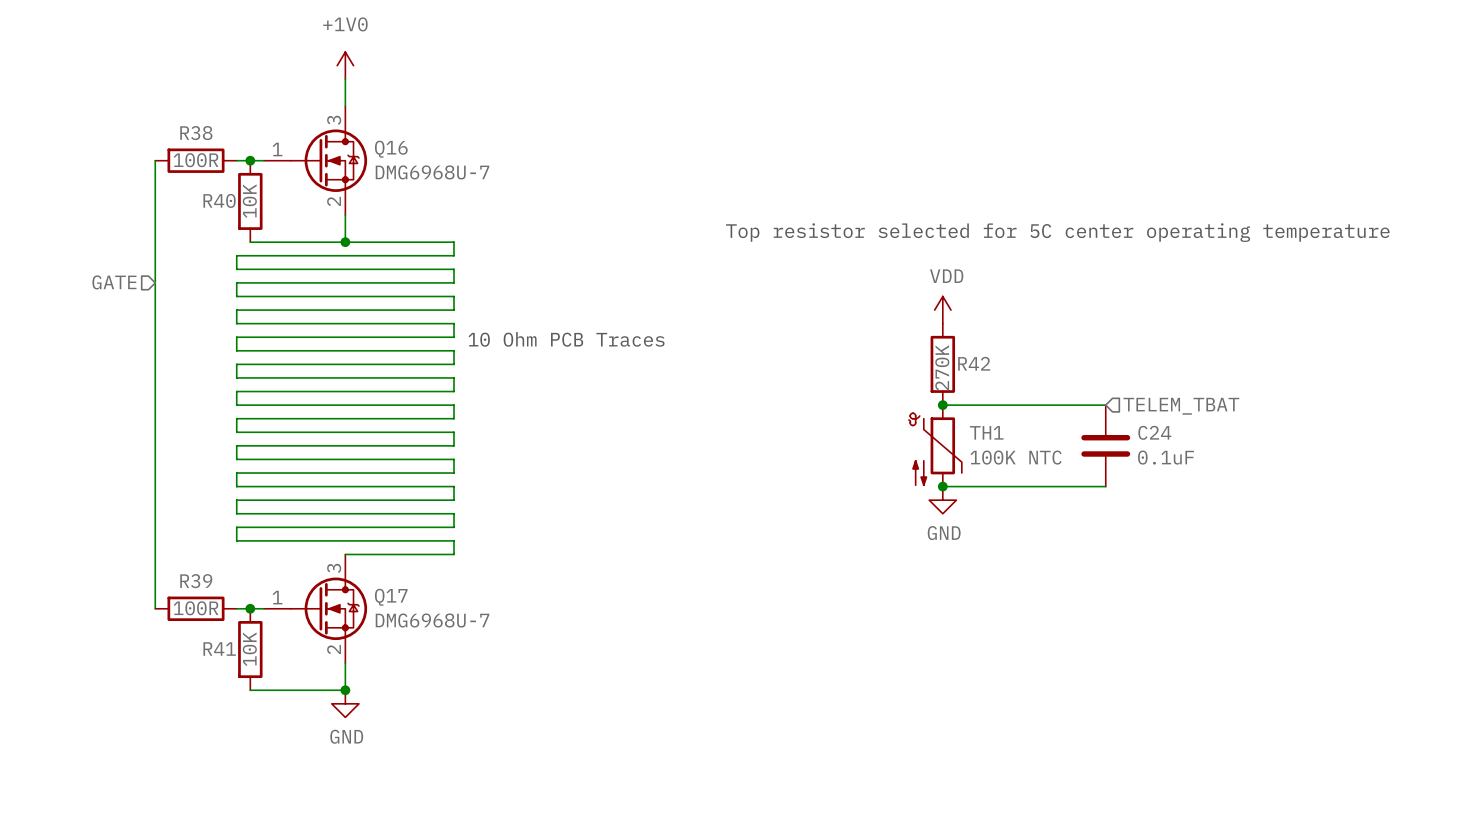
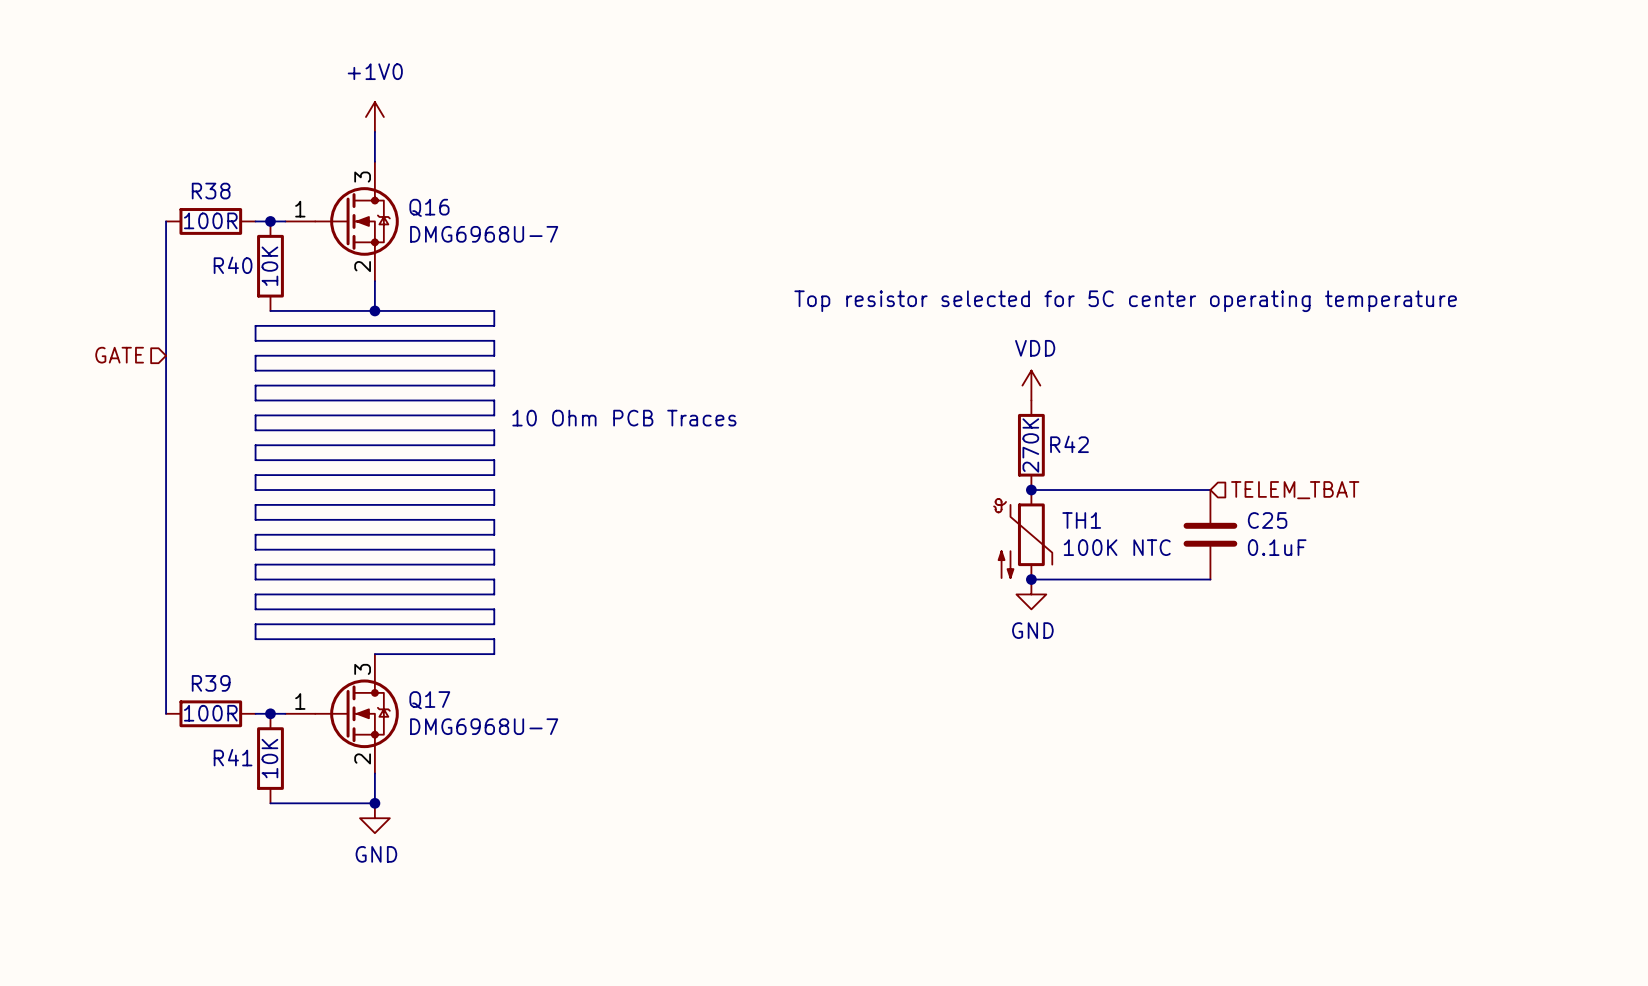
C24 name: C24 (1154, 432) -> C25 (1267, 520)

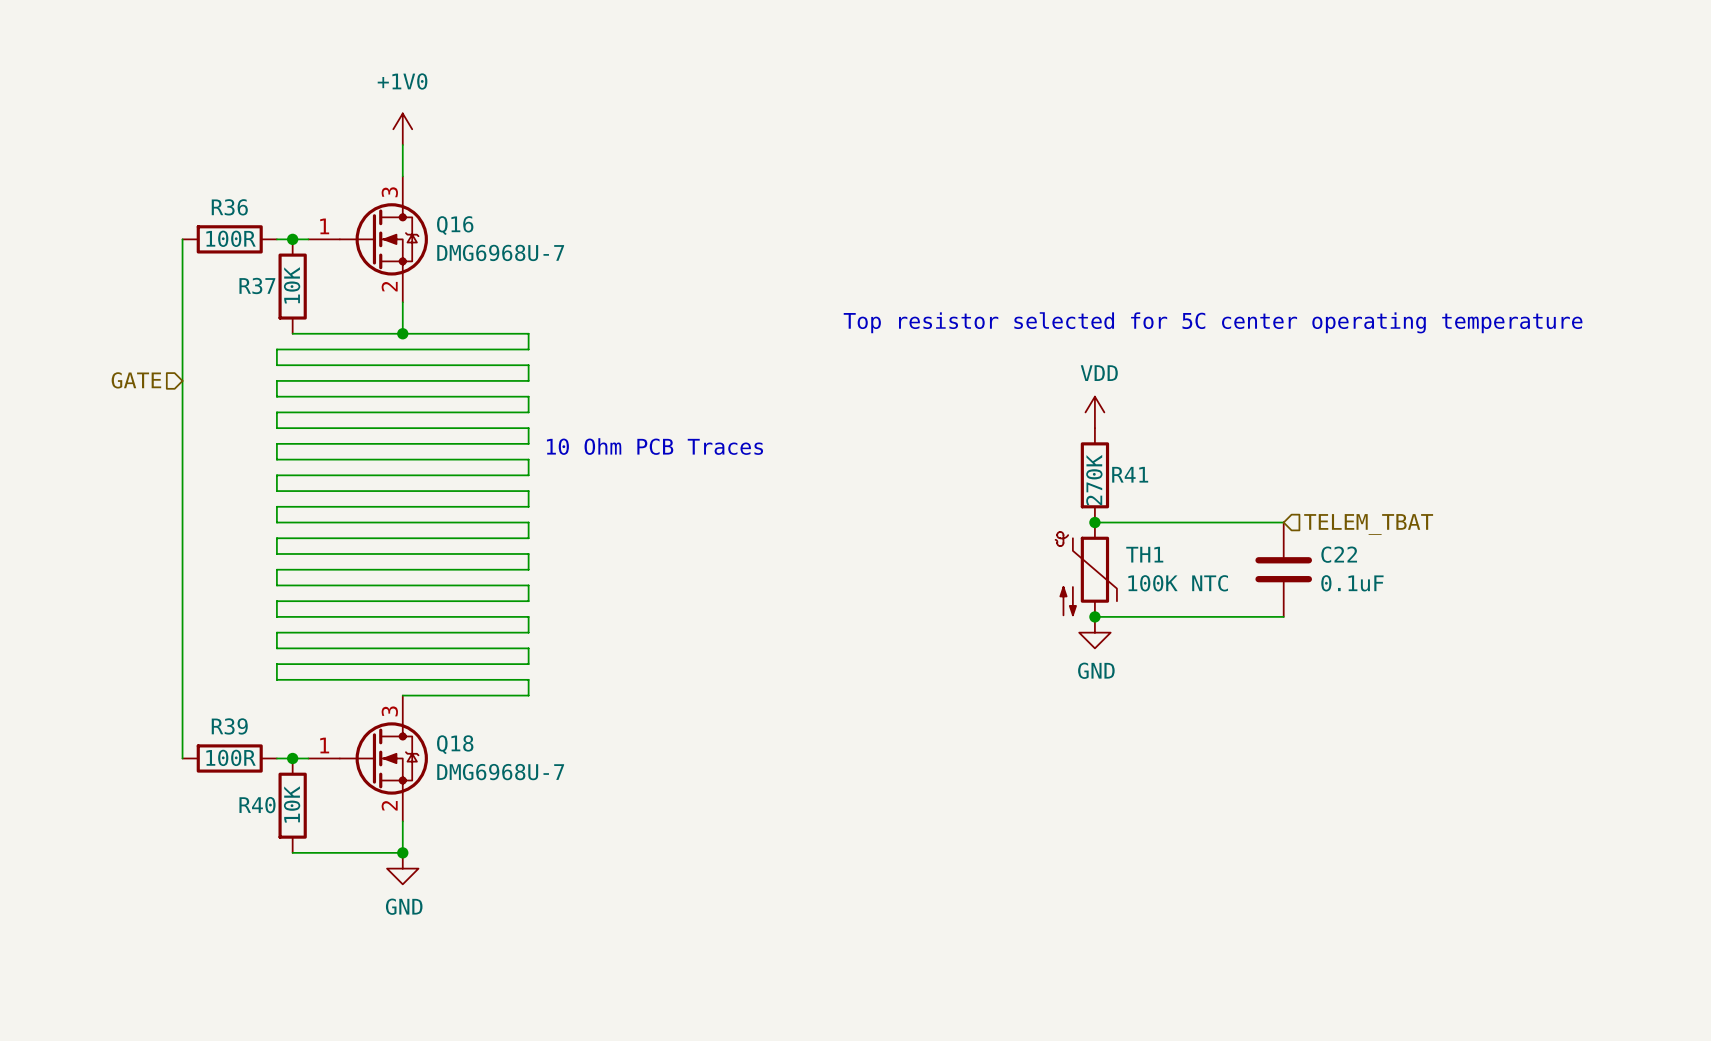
R38 name: R38 (211, 191) -> R36 (229, 207)
R40 name: R40 (233, 265) -> R37 (257, 285)
R42 name: R42 (1069, 444) -> R41 (1130, 474)
C25 name: C25 (1267, 520) -> C22 (1339, 554)
Q17 name: Q17 (429, 700) -> Q18 (455, 744)
R41 name: R41 (233, 757) -> R40 (257, 805)

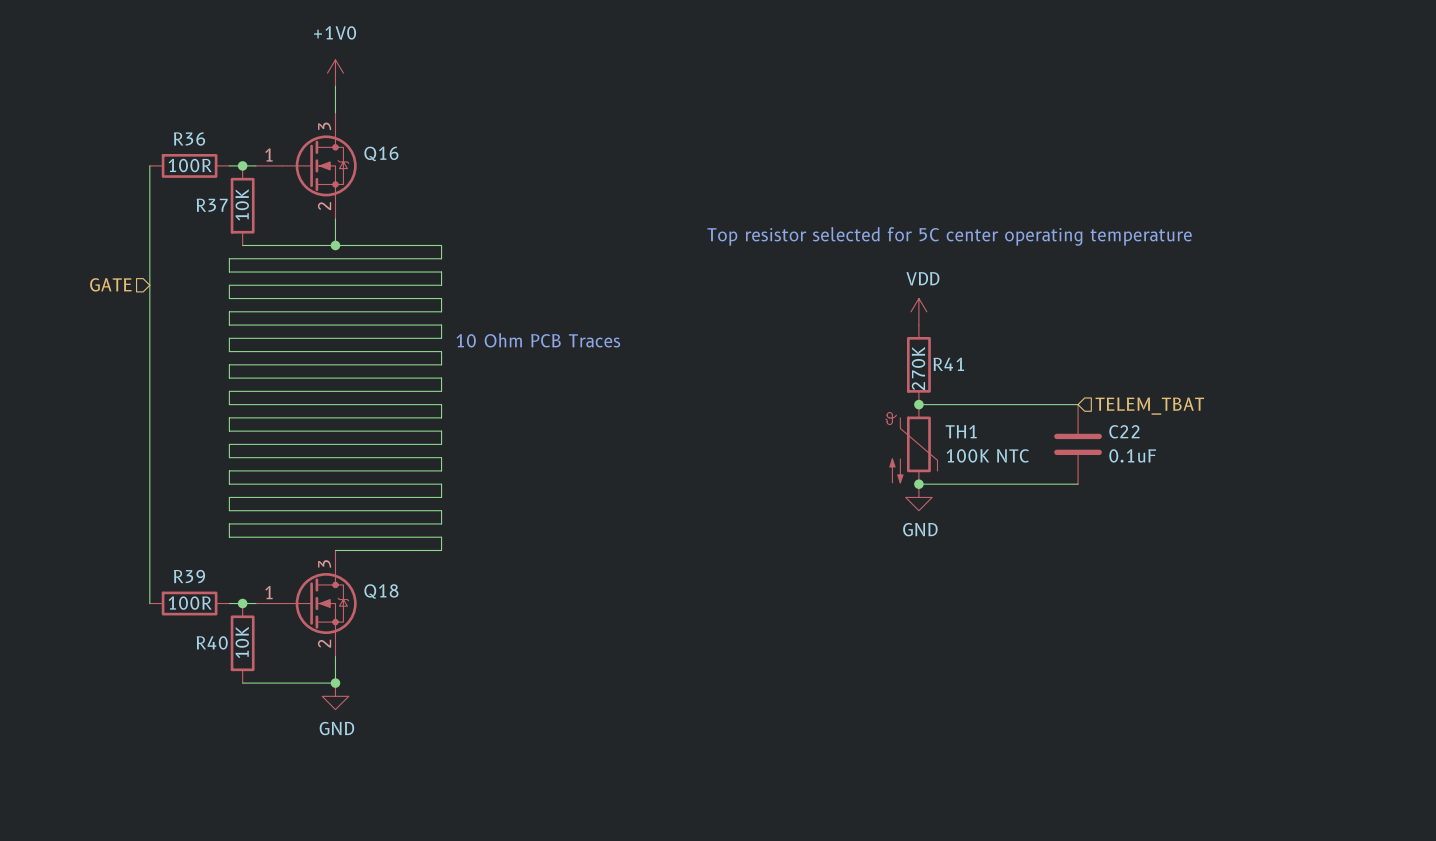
Q16 value: DMG6968U-7 (500, 252) -> none
Q18 value: DMG6968U-7 (500, 772) -> none

